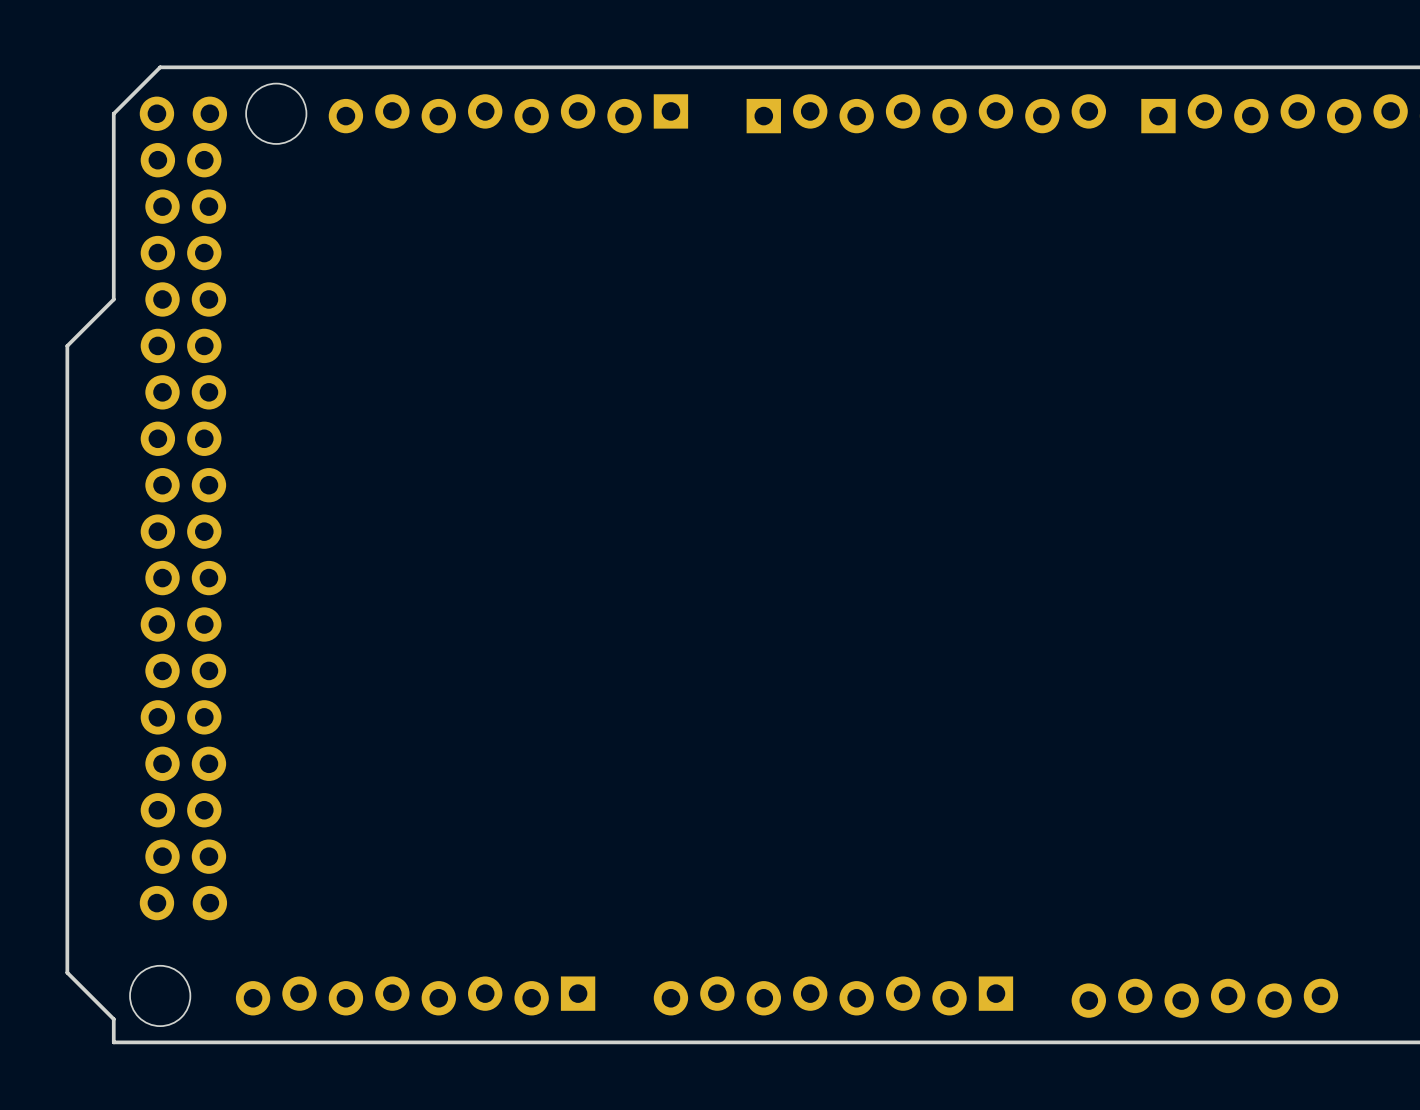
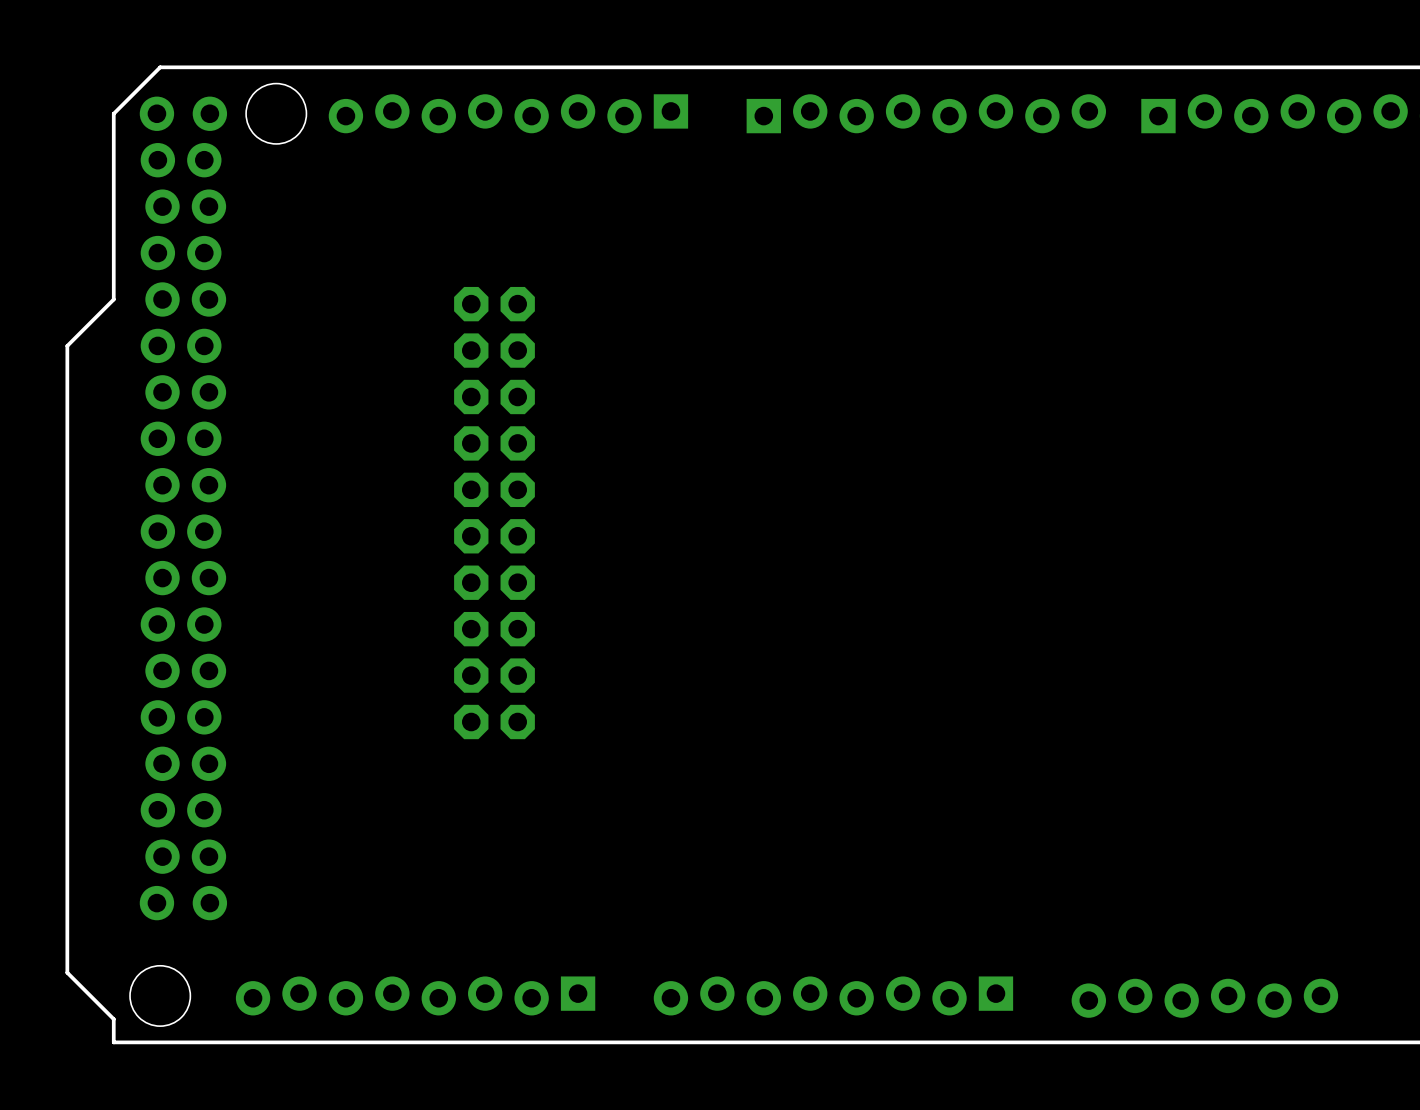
part: none -> (494, 396)
part: none -> (494, 629)

